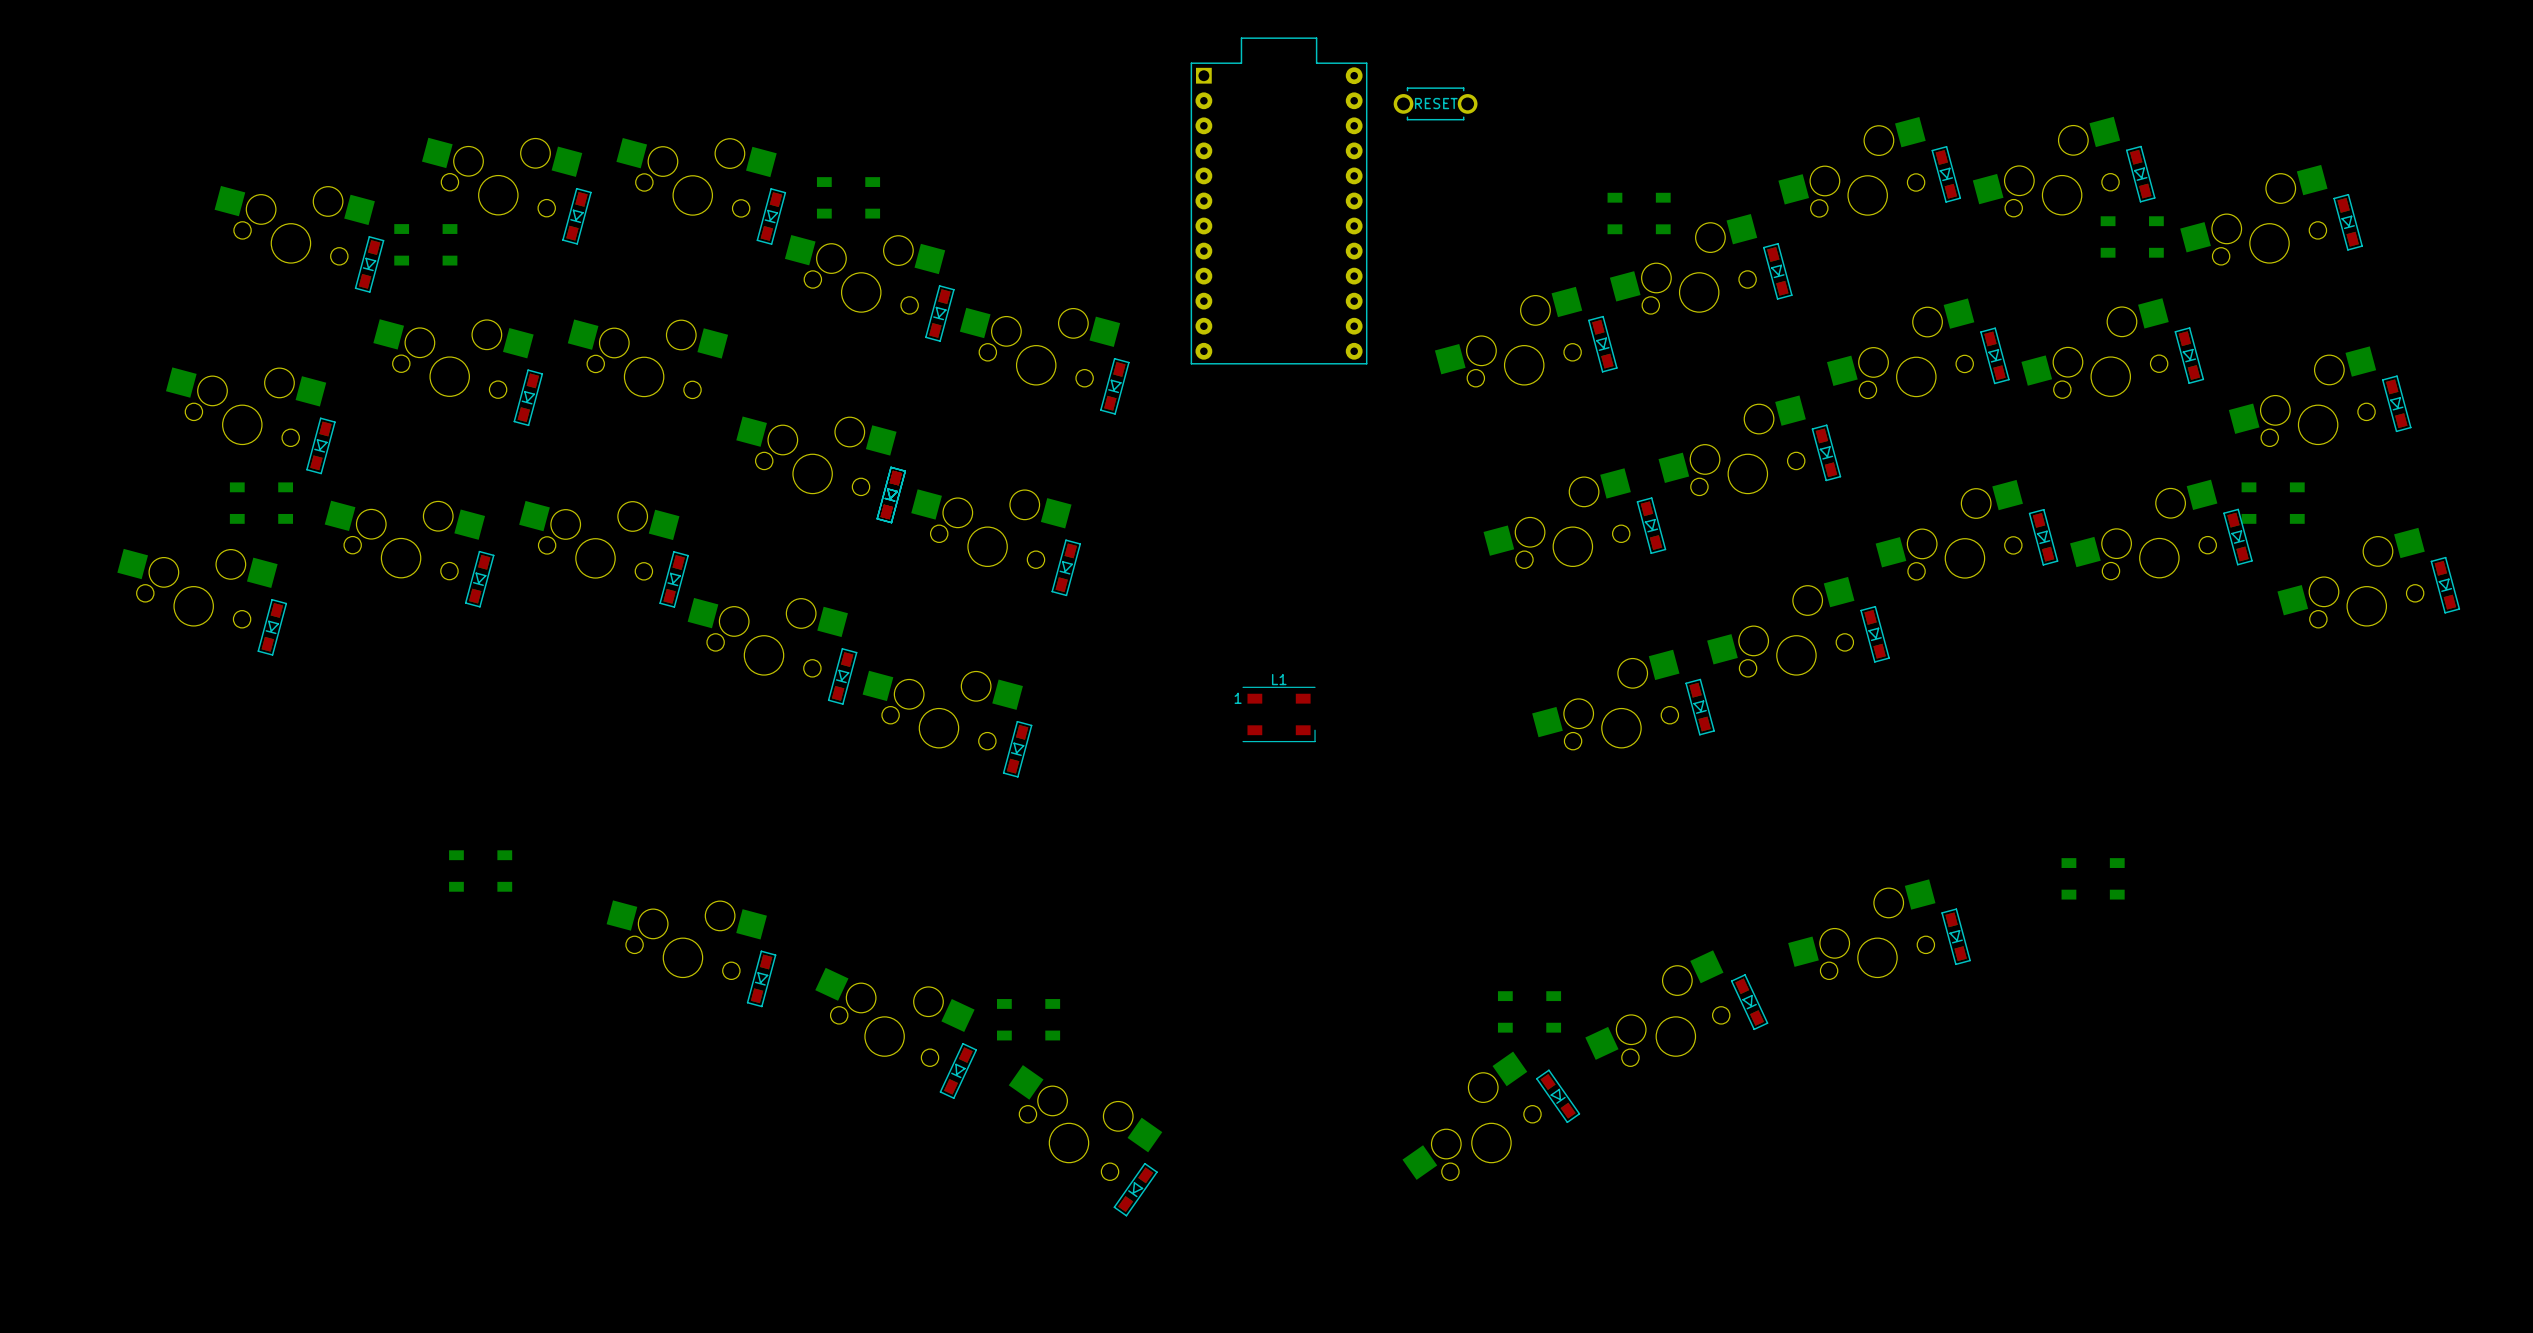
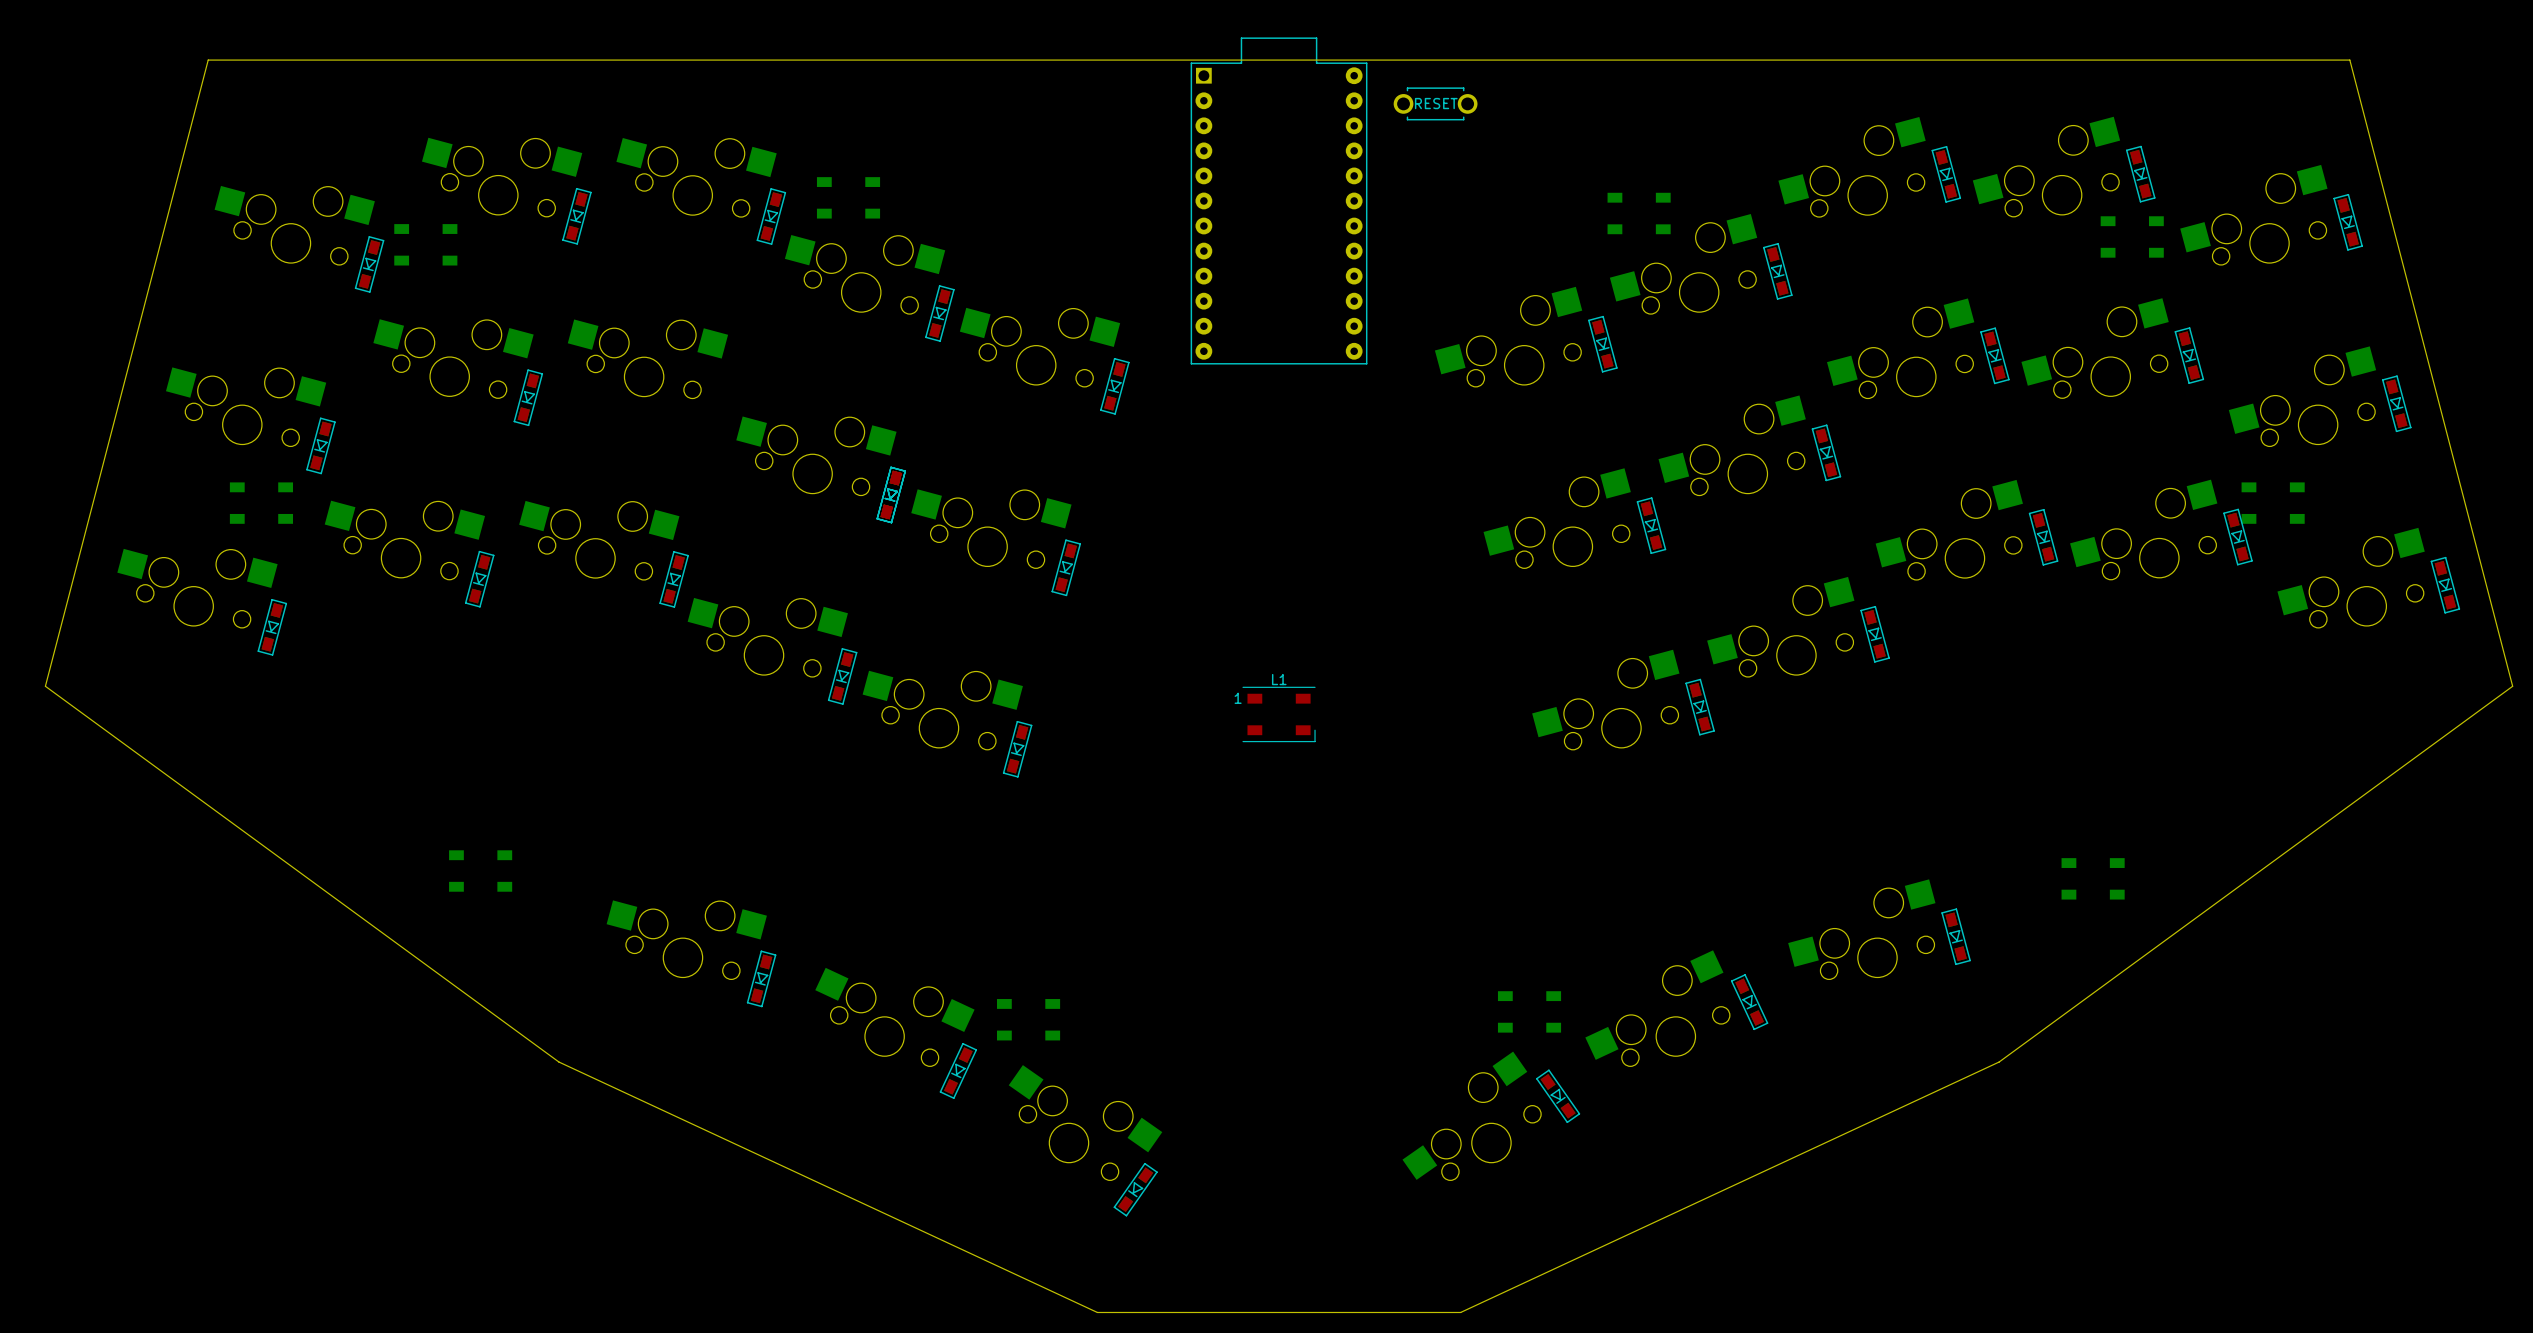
board edge: none -> (208, 60) (45, 686) (558, 1062) (1097, 1312) (1460, 1312) (1999, 1062) (2512, 686) (2349, 60) (208, 60)

